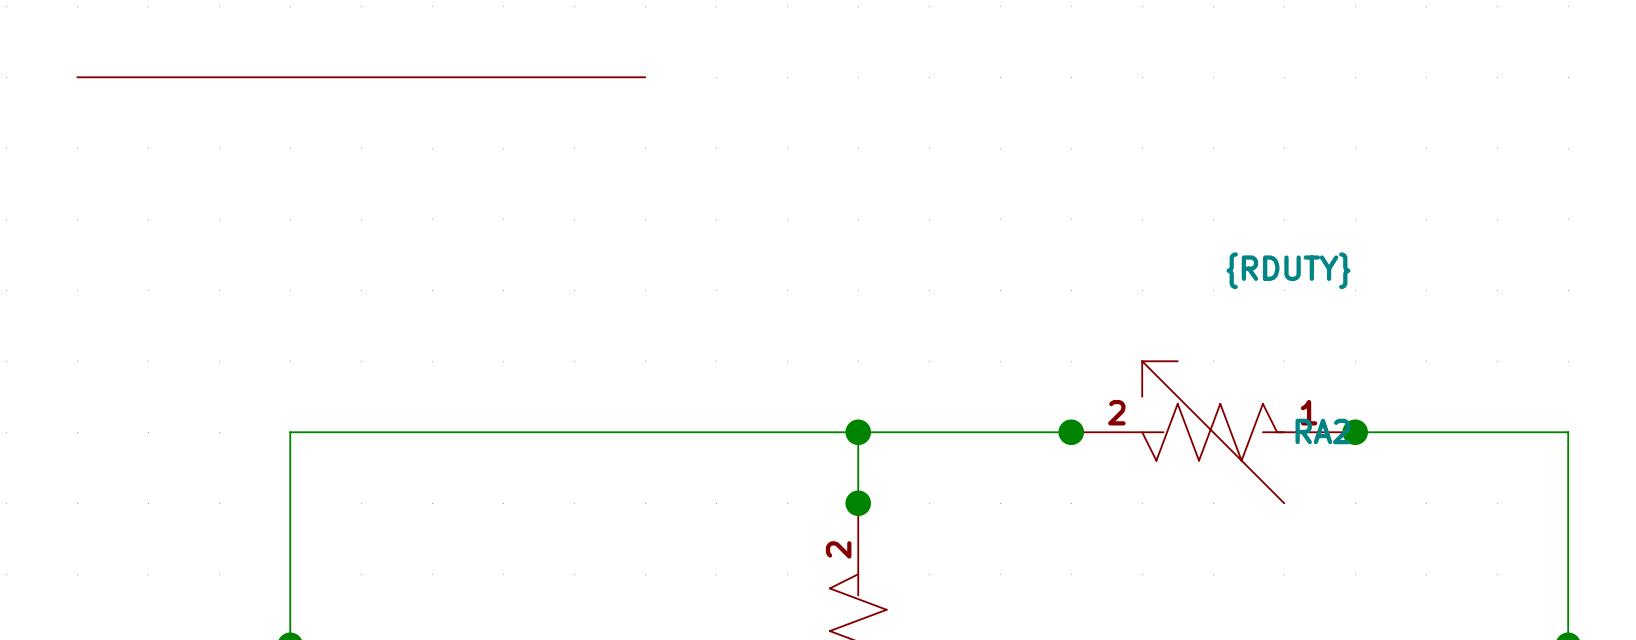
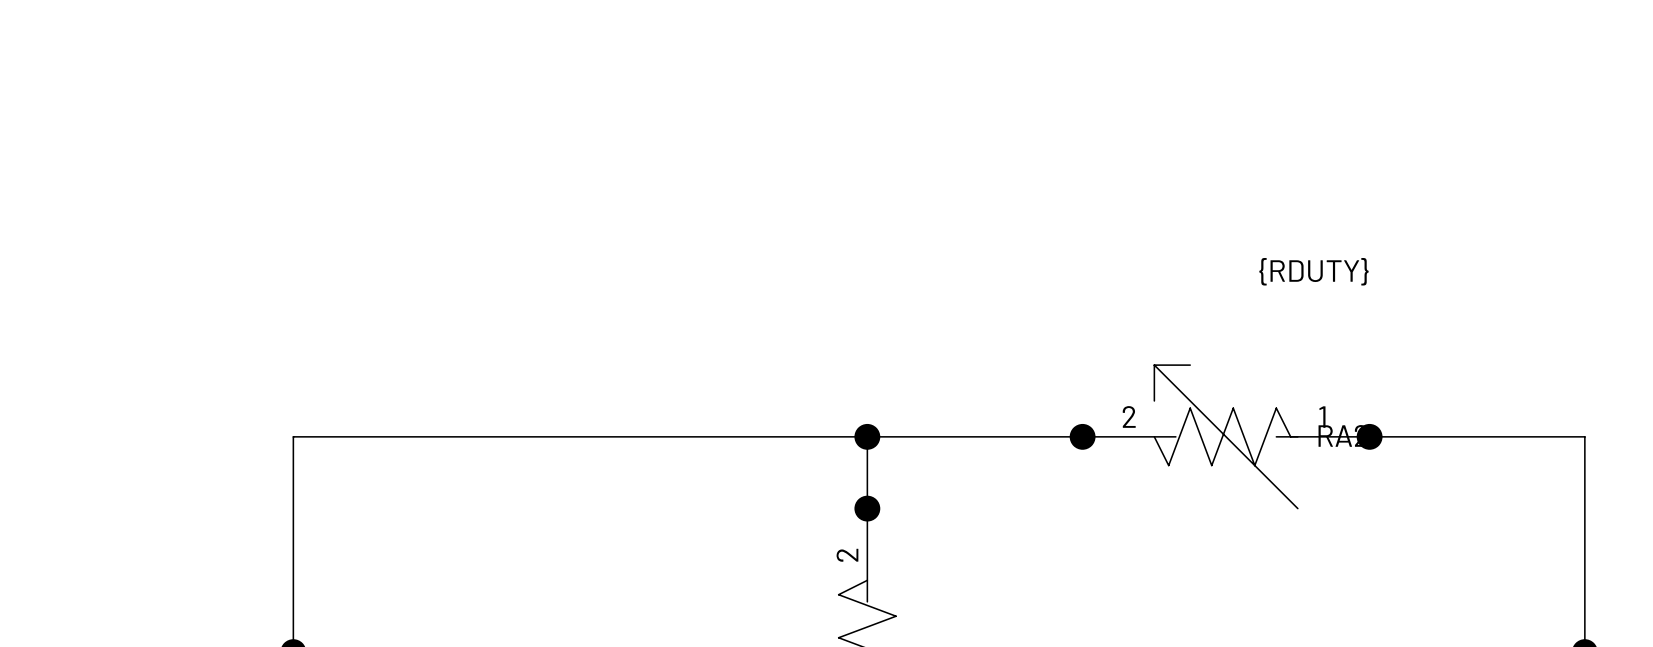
part: (361, 77) -> none

